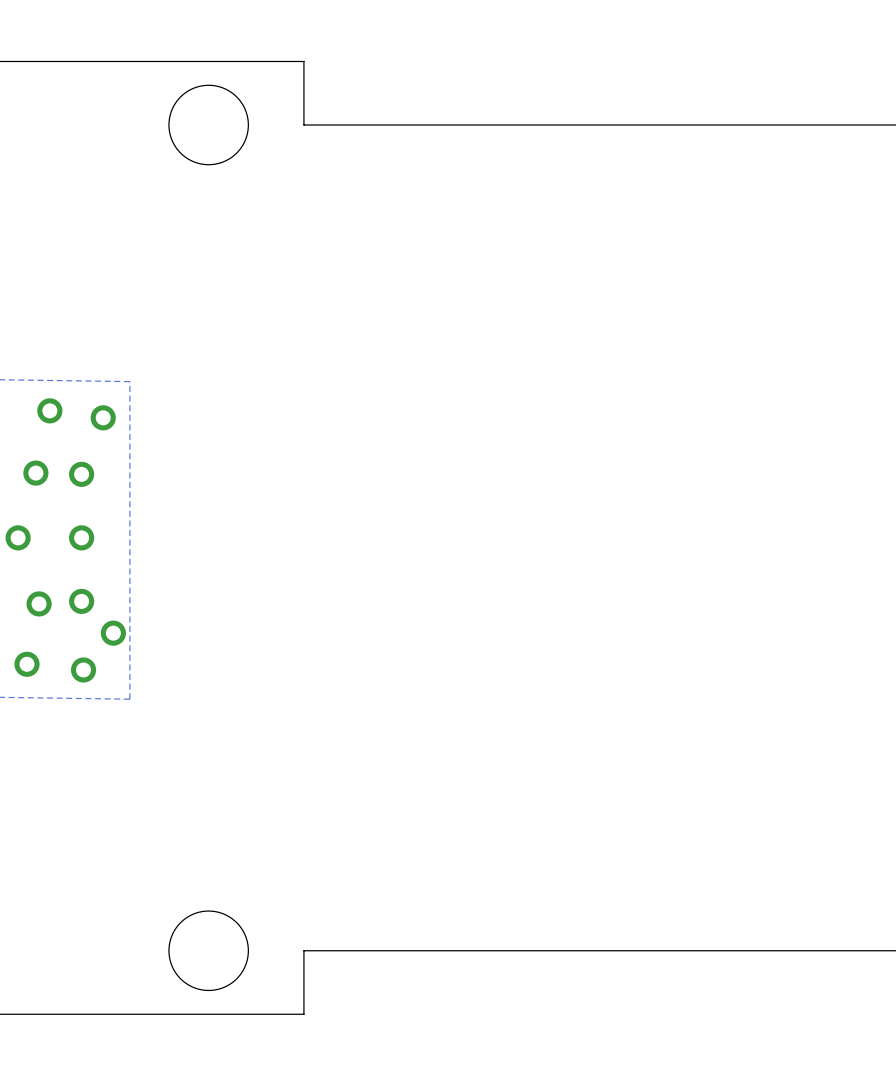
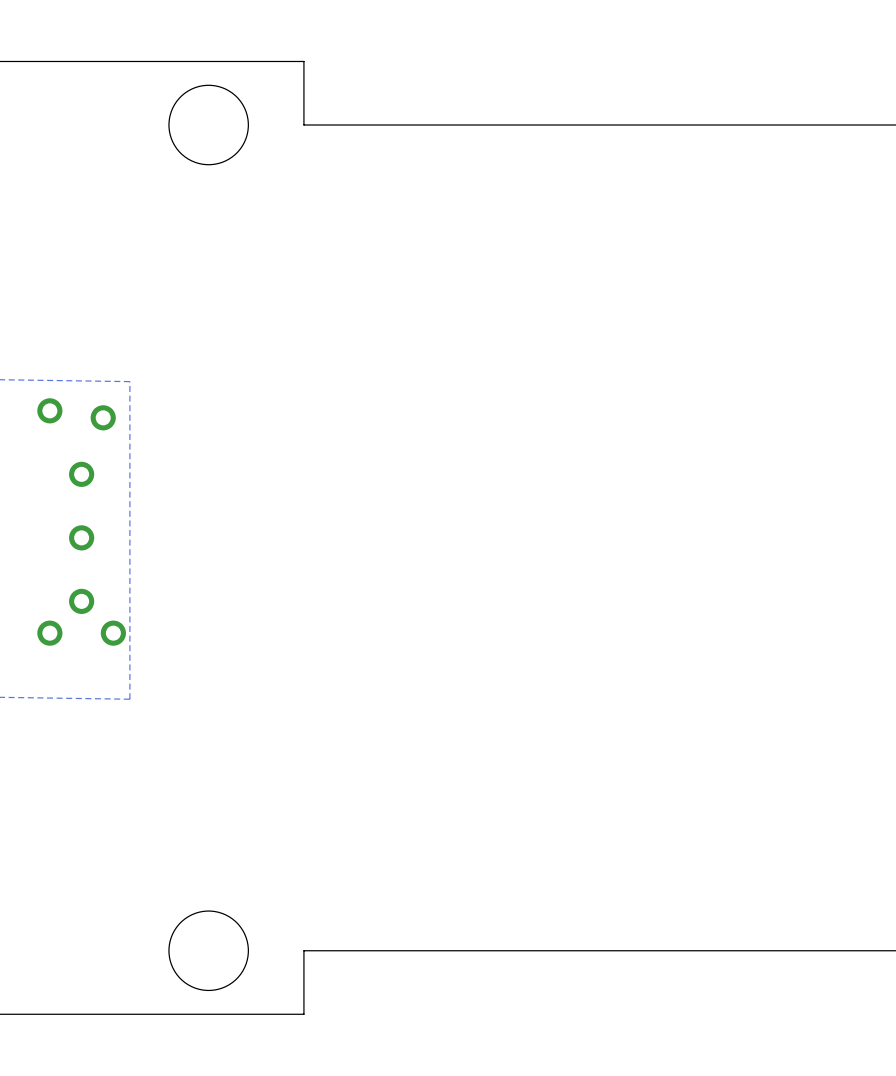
via: (35, 473) -> none
via: (18, 537) -> none
via: (39, 603) -> none
via: none -> (49, 633)
via: (27, 664) -> none
via: (83, 669) -> none

